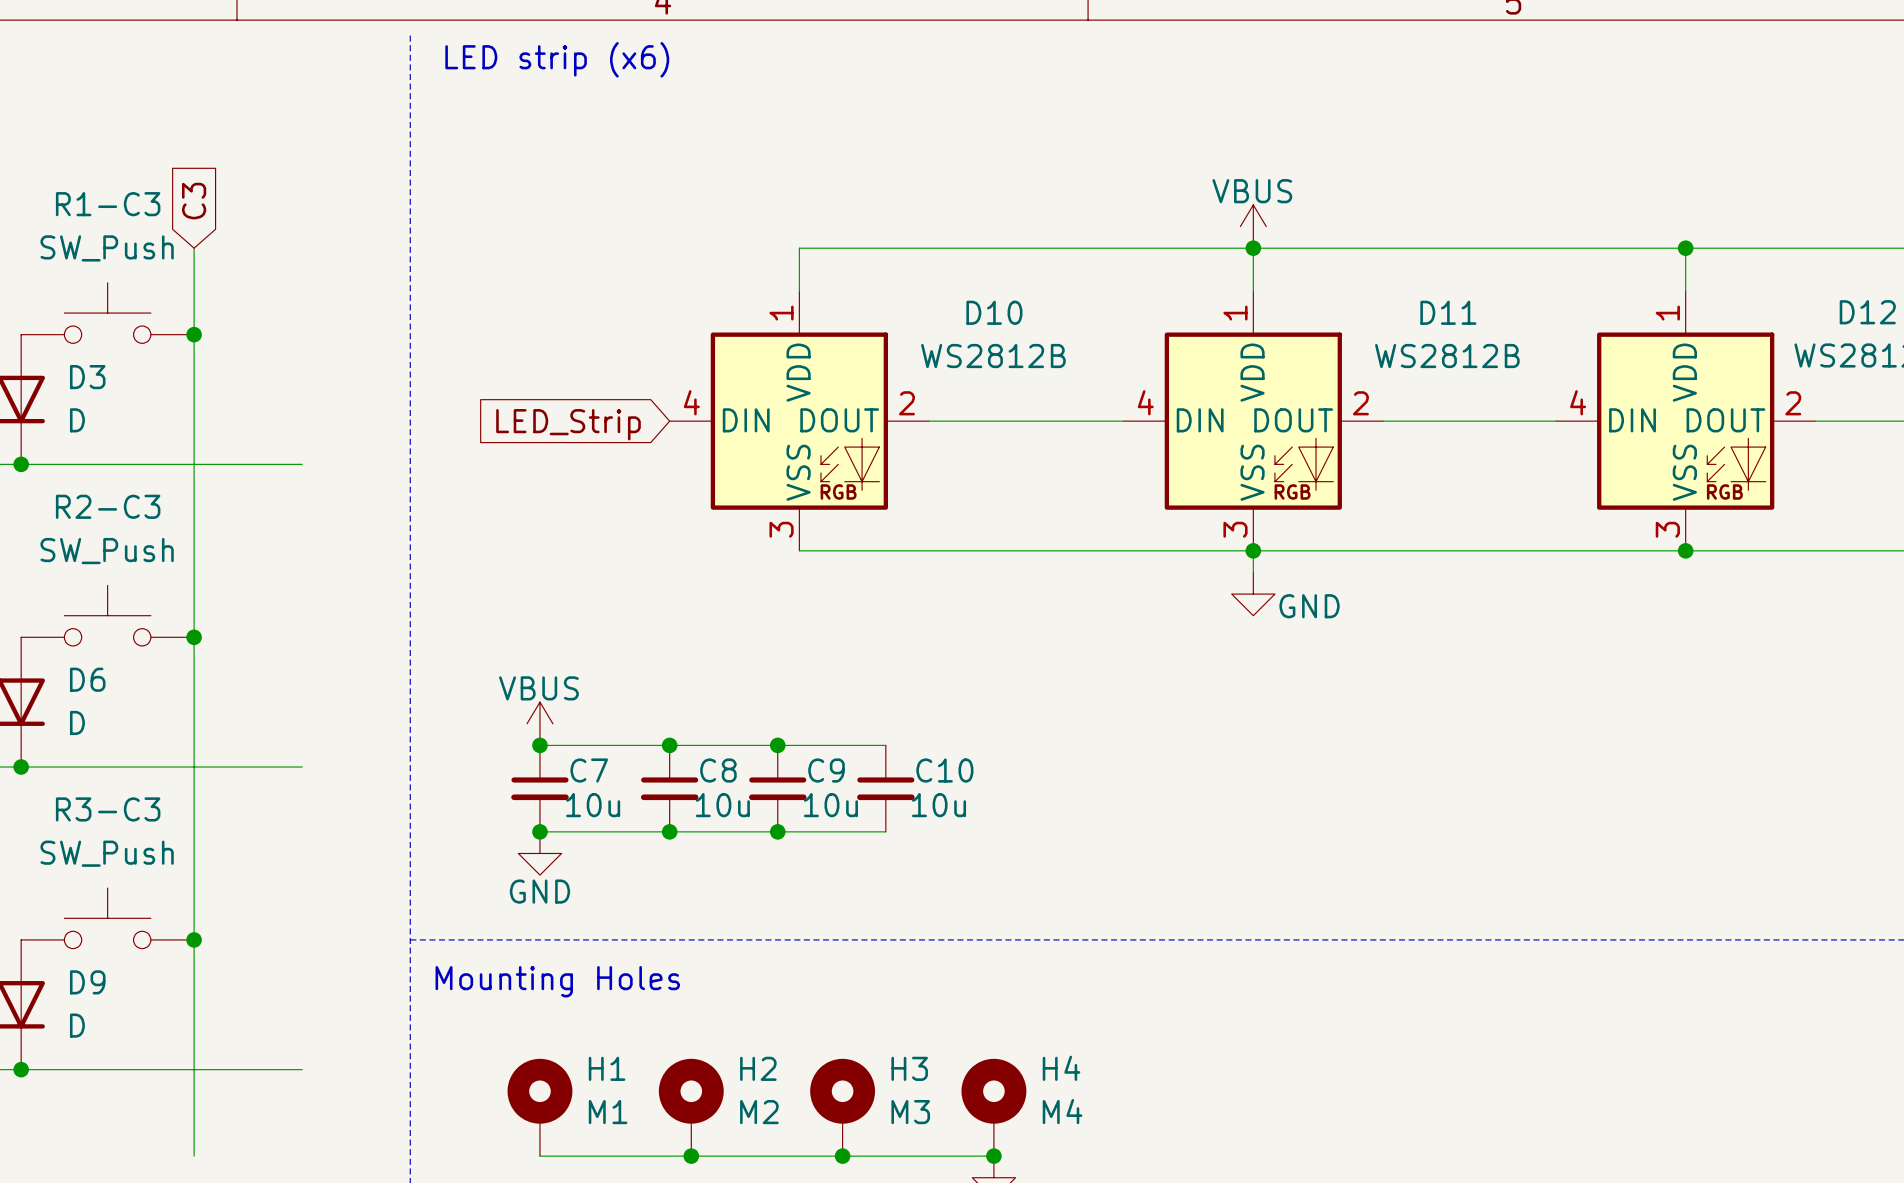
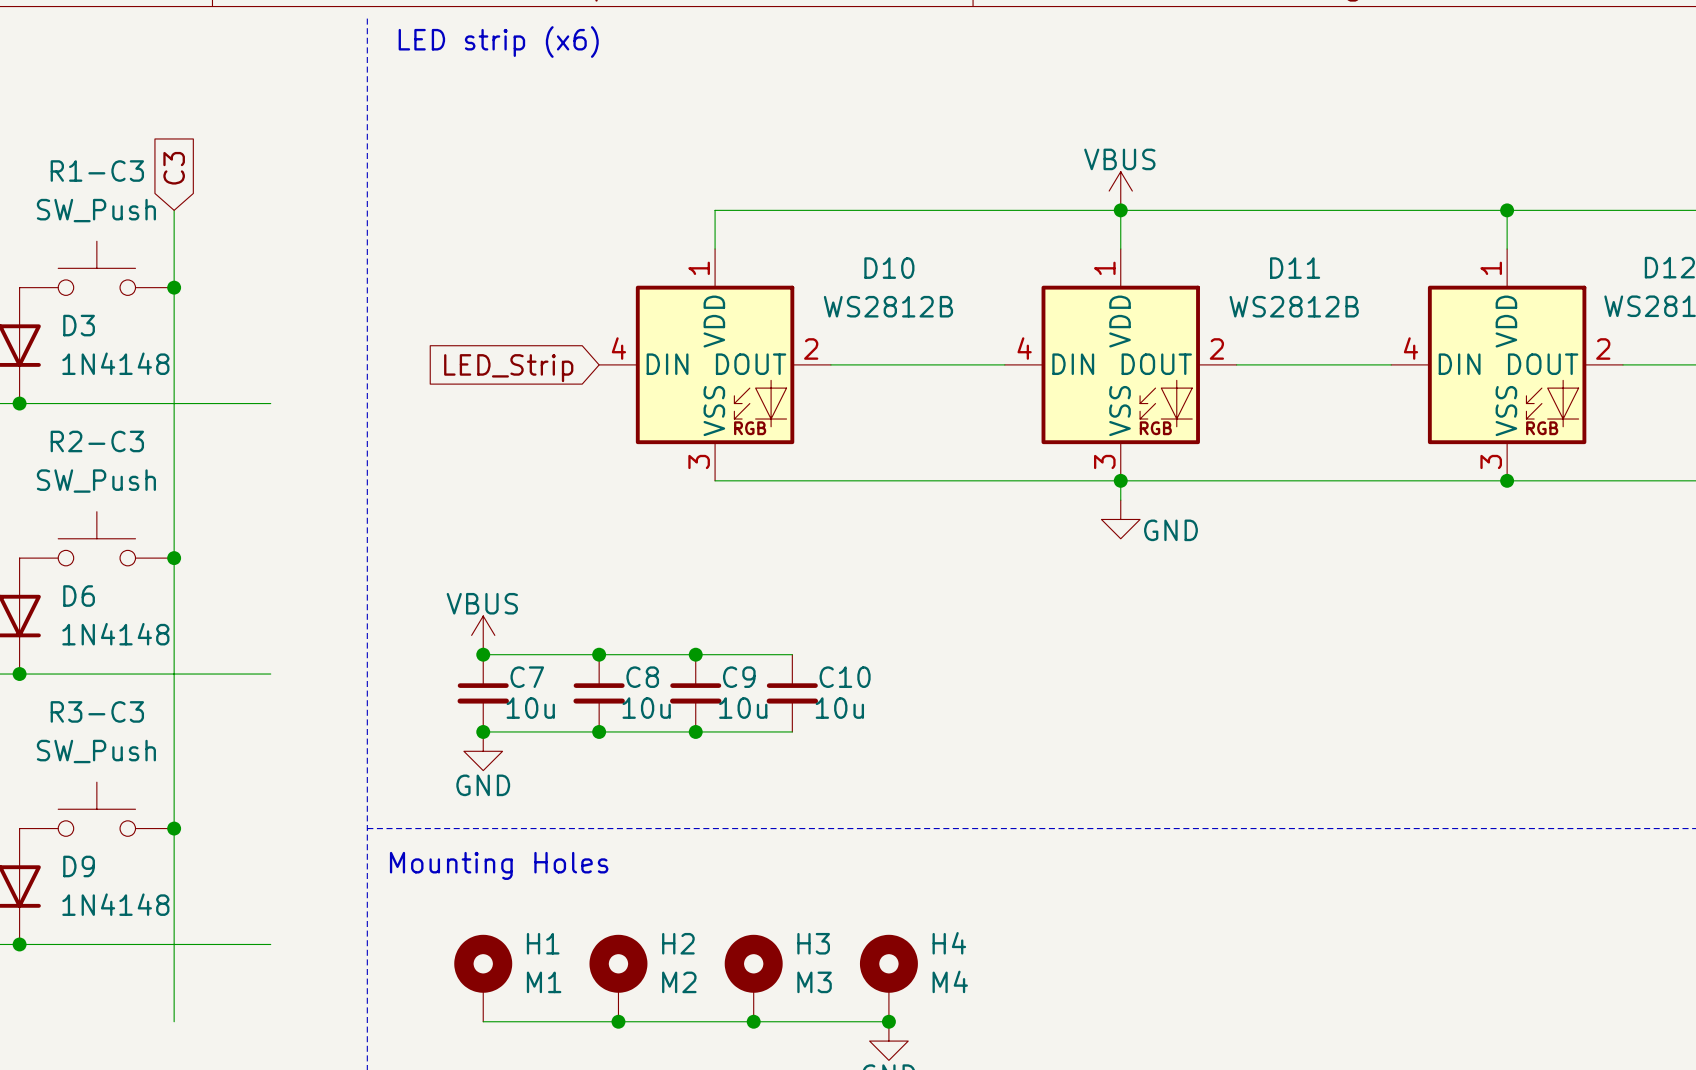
D3 value: D (77, 420) -> 1N4148 (115, 363)
D6 value: D (77, 722) -> 1N4148 (115, 634)
D9 value: D (77, 1025) -> 1N4148 (115, 904)

